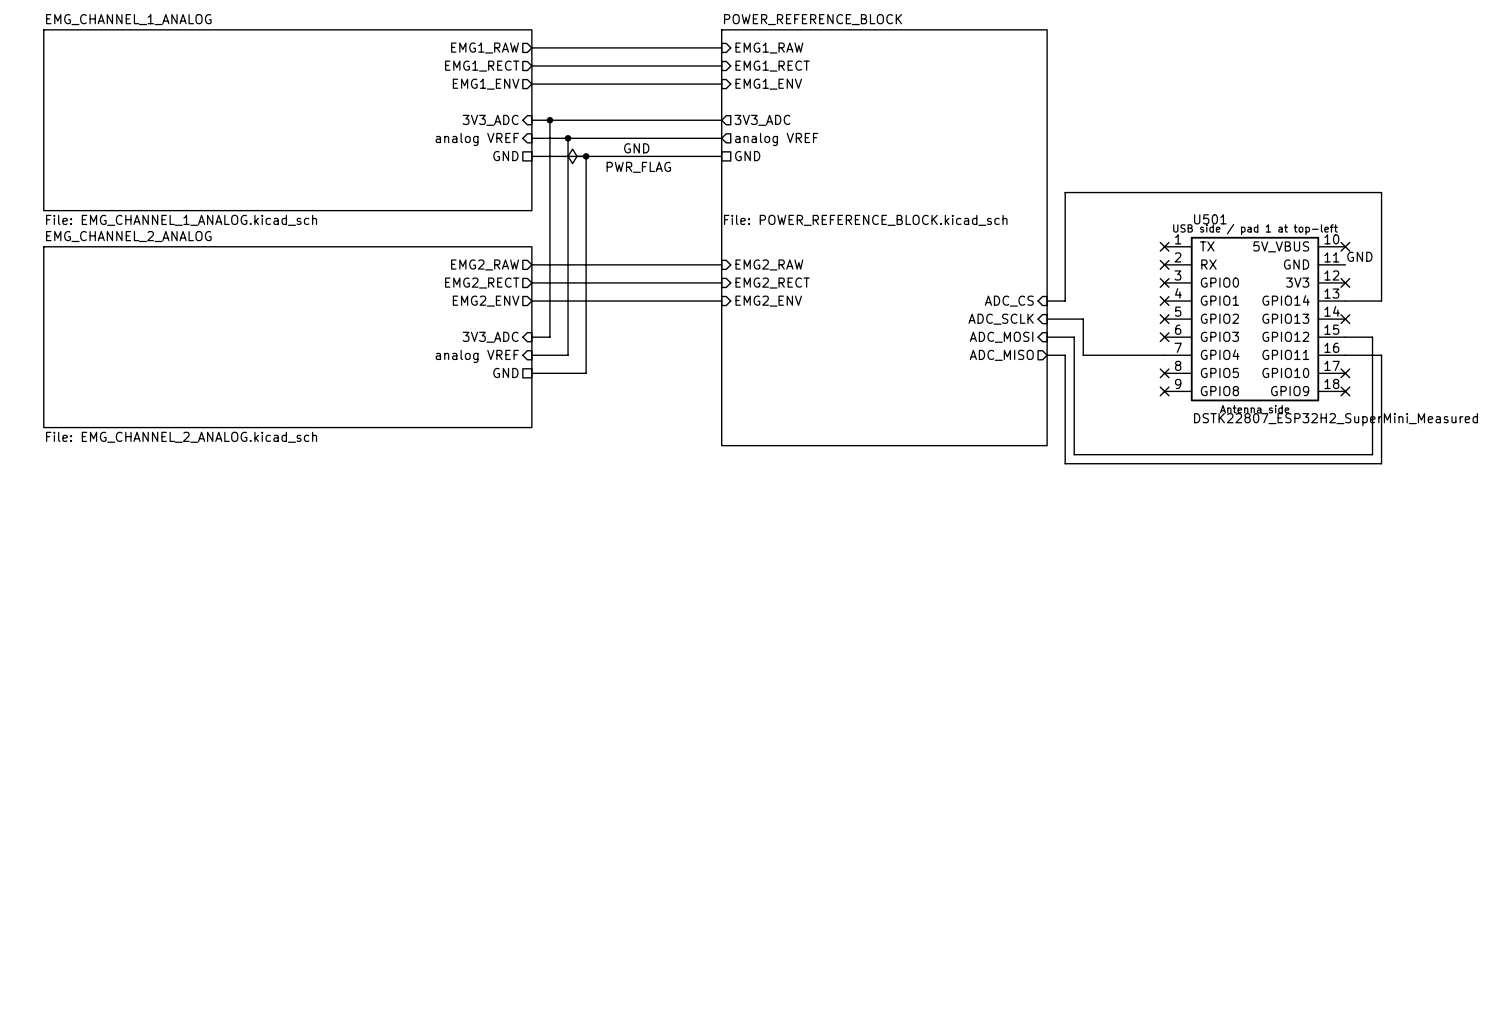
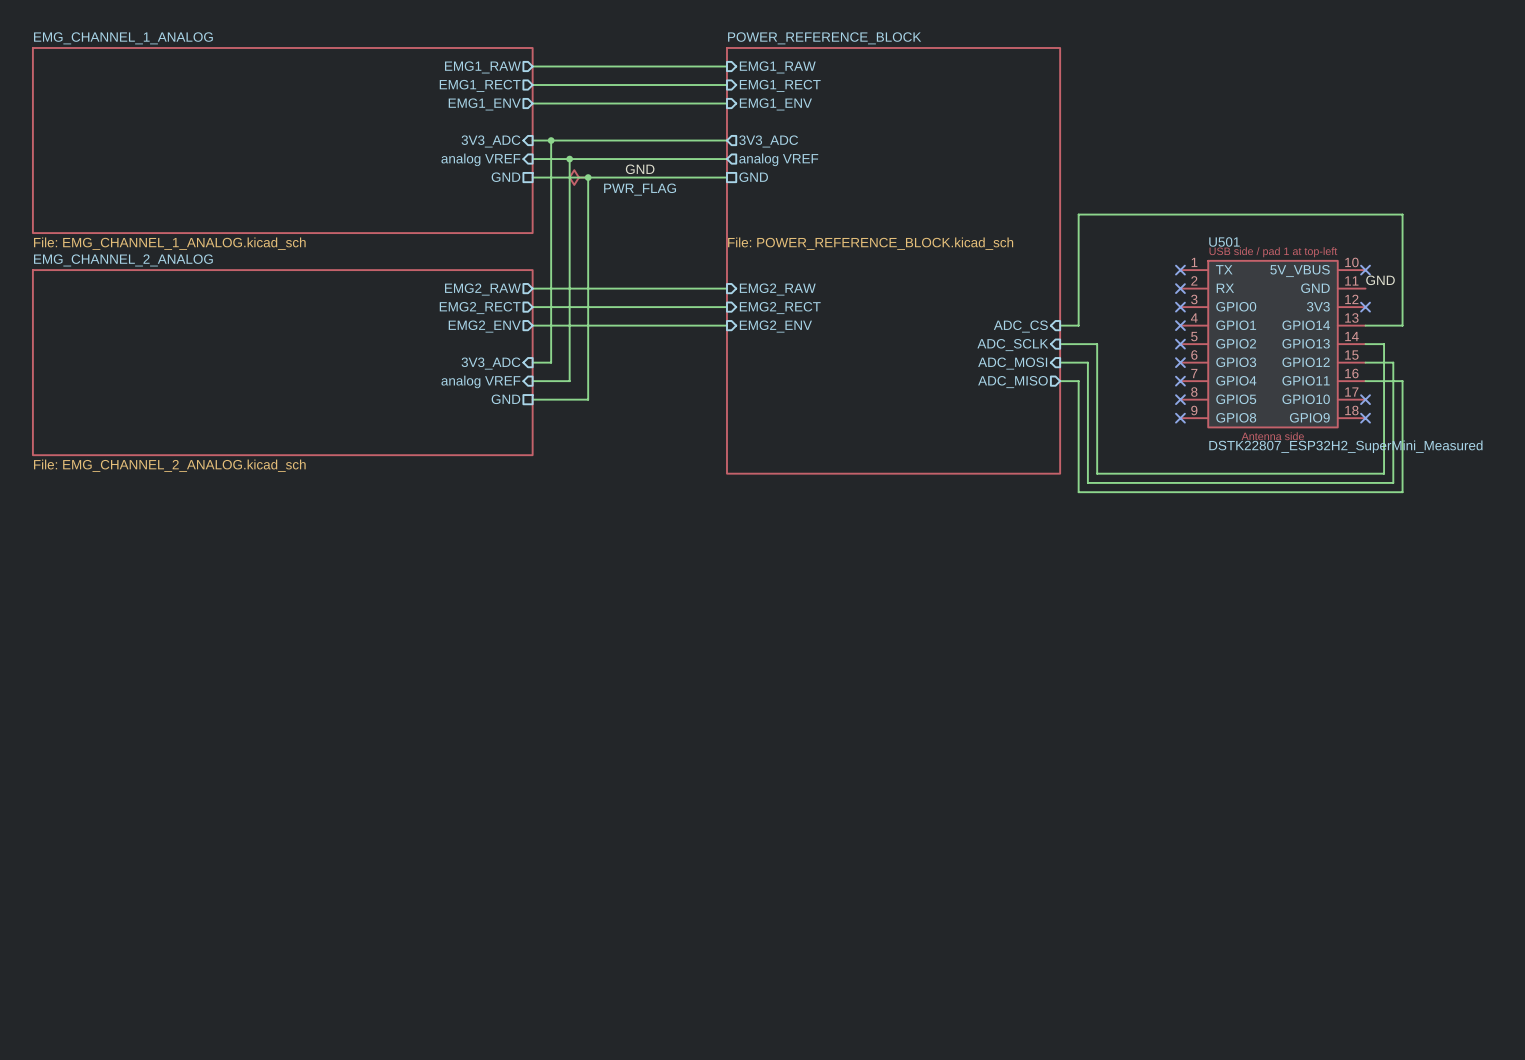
no-connect mark: (1345, 319) -> none
wire: (1083, 355) (1164, 355) -> (1097, 381) (1097, 473) (1384, 473) (1384, 344) (1365, 344)
no-connect mark: none -> (1180, 381)

